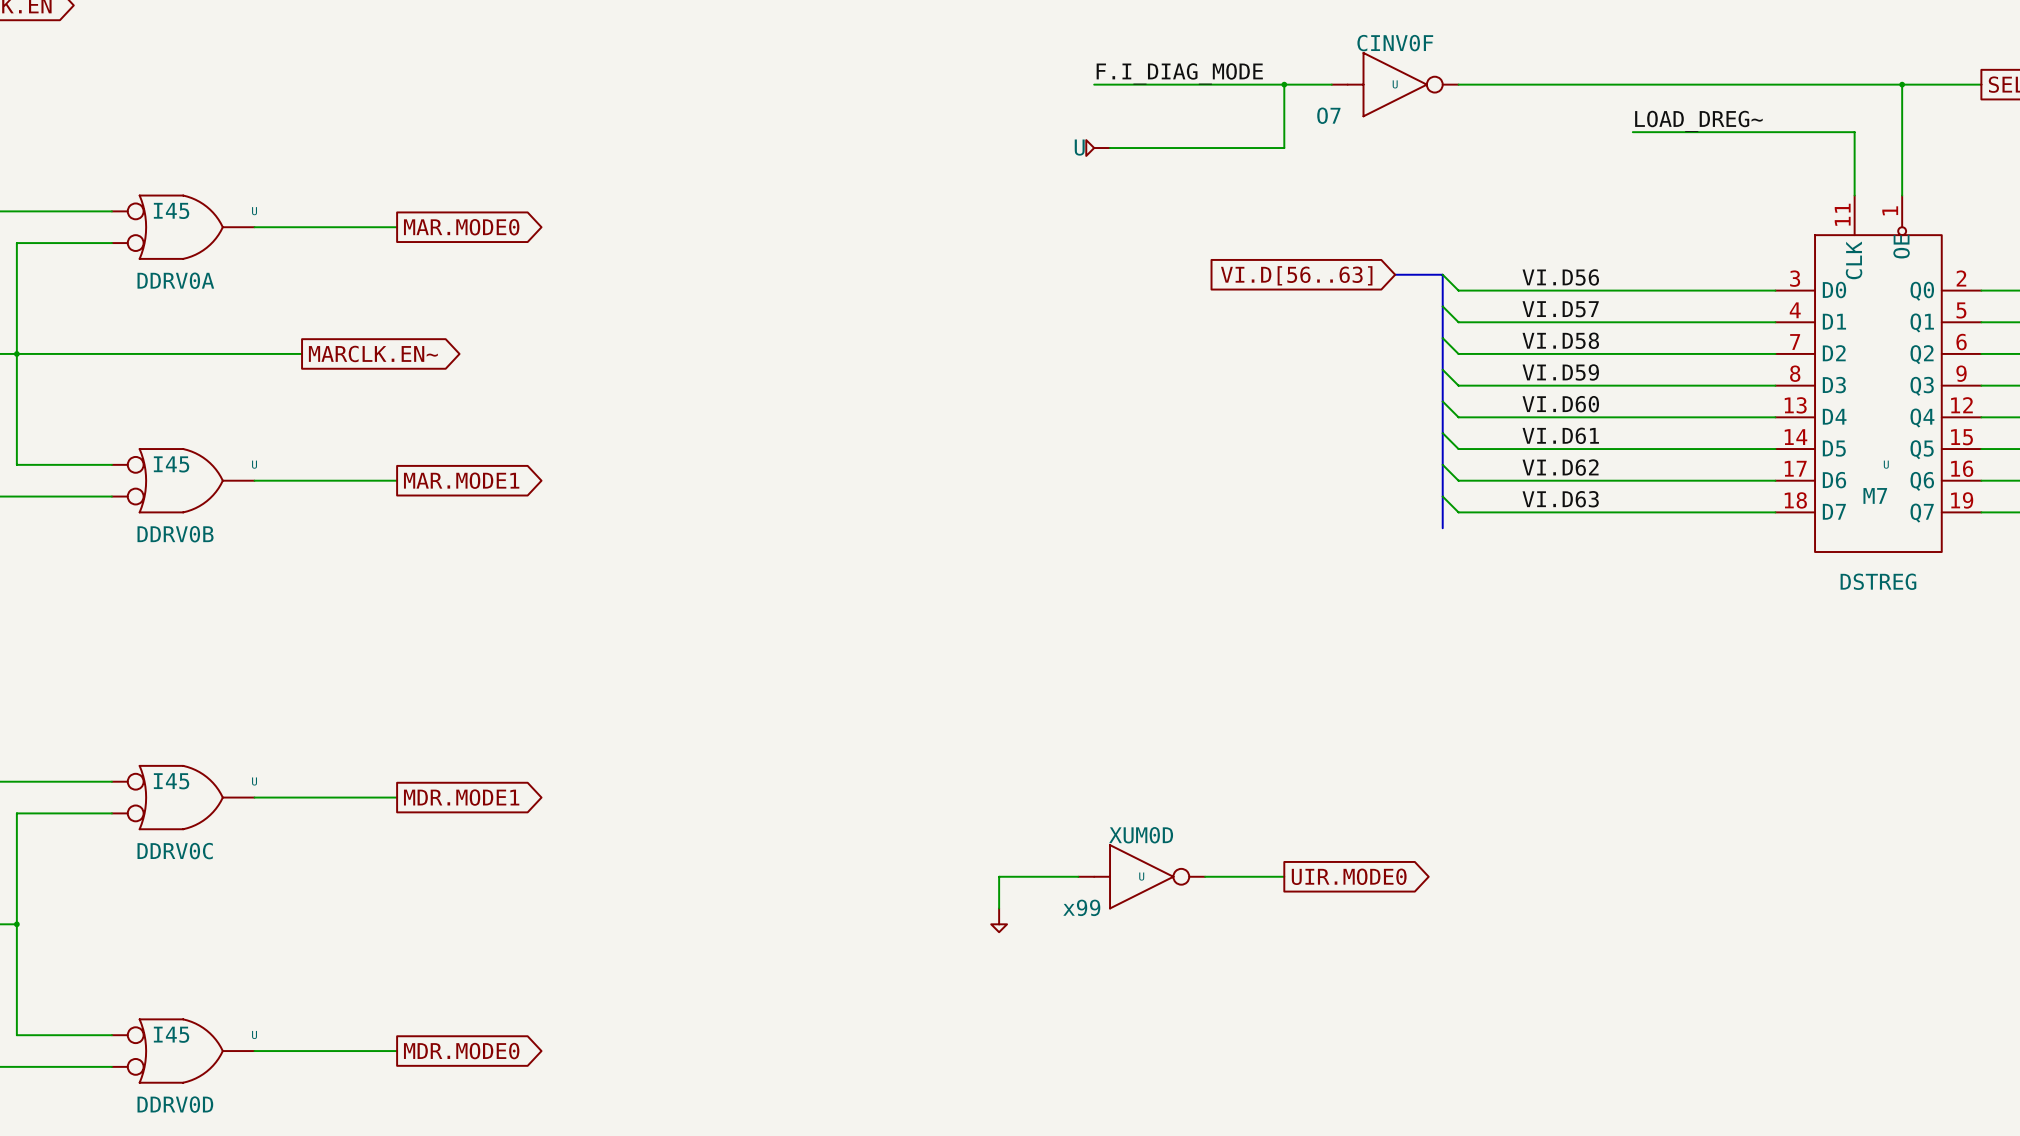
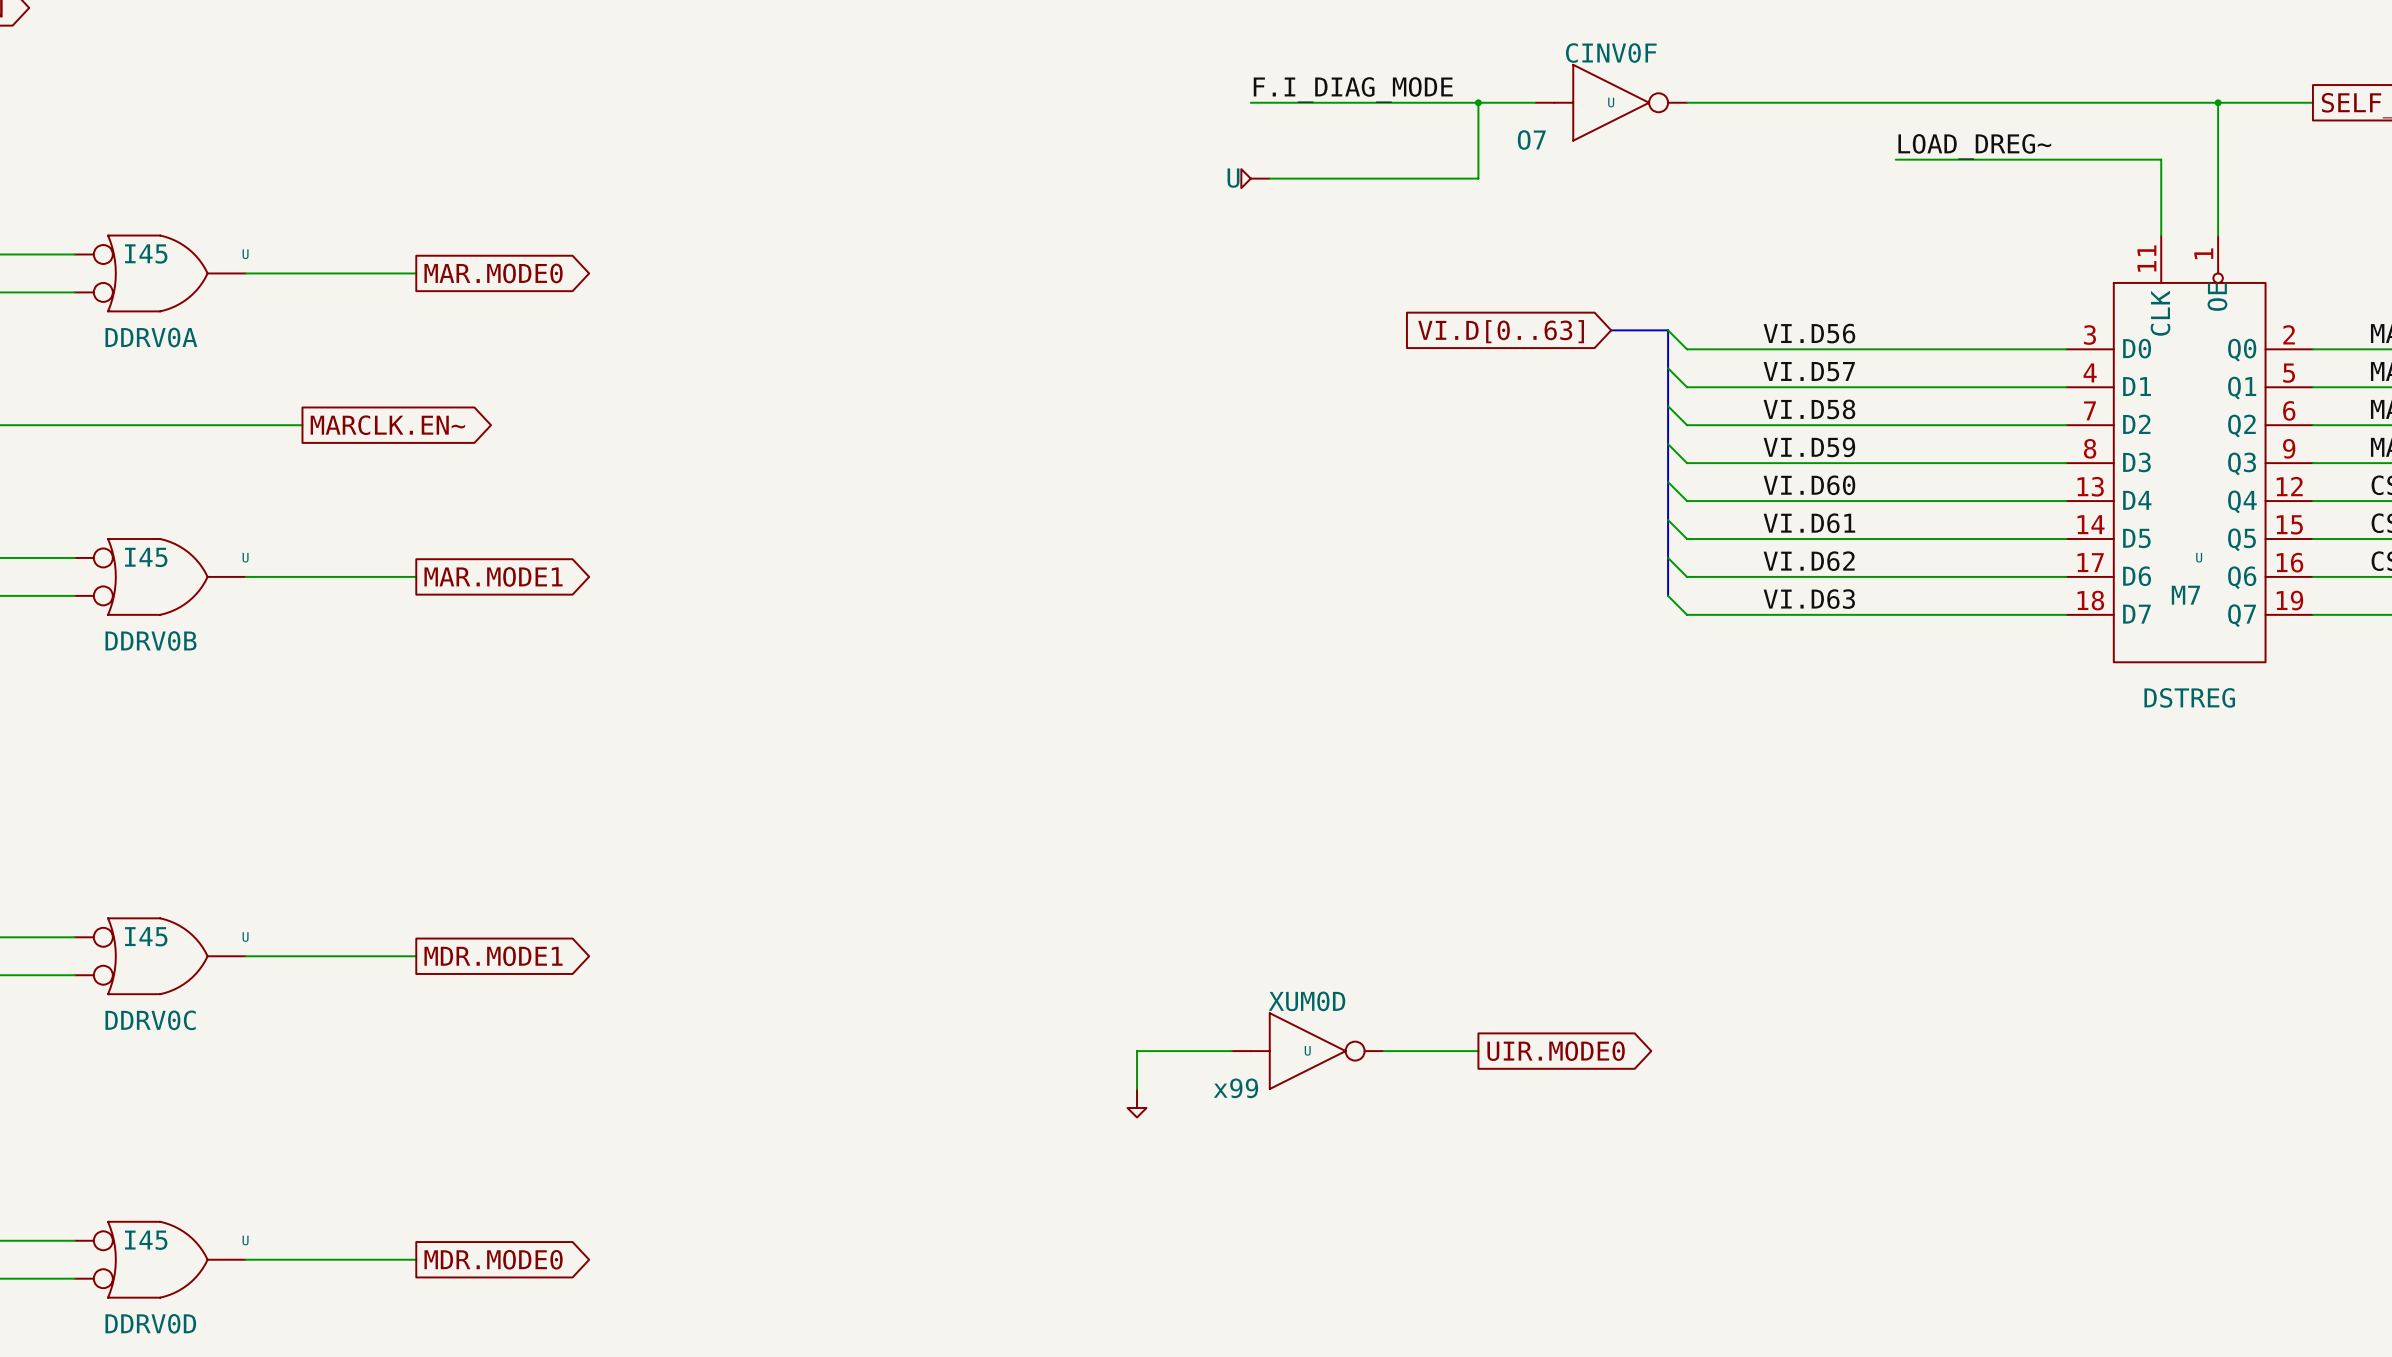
global label: VI.D[56..63] (1296, 275) -> VI.D[0..63] (1501, 331)
bus: (1442, 496) (1442, 528) -> none

